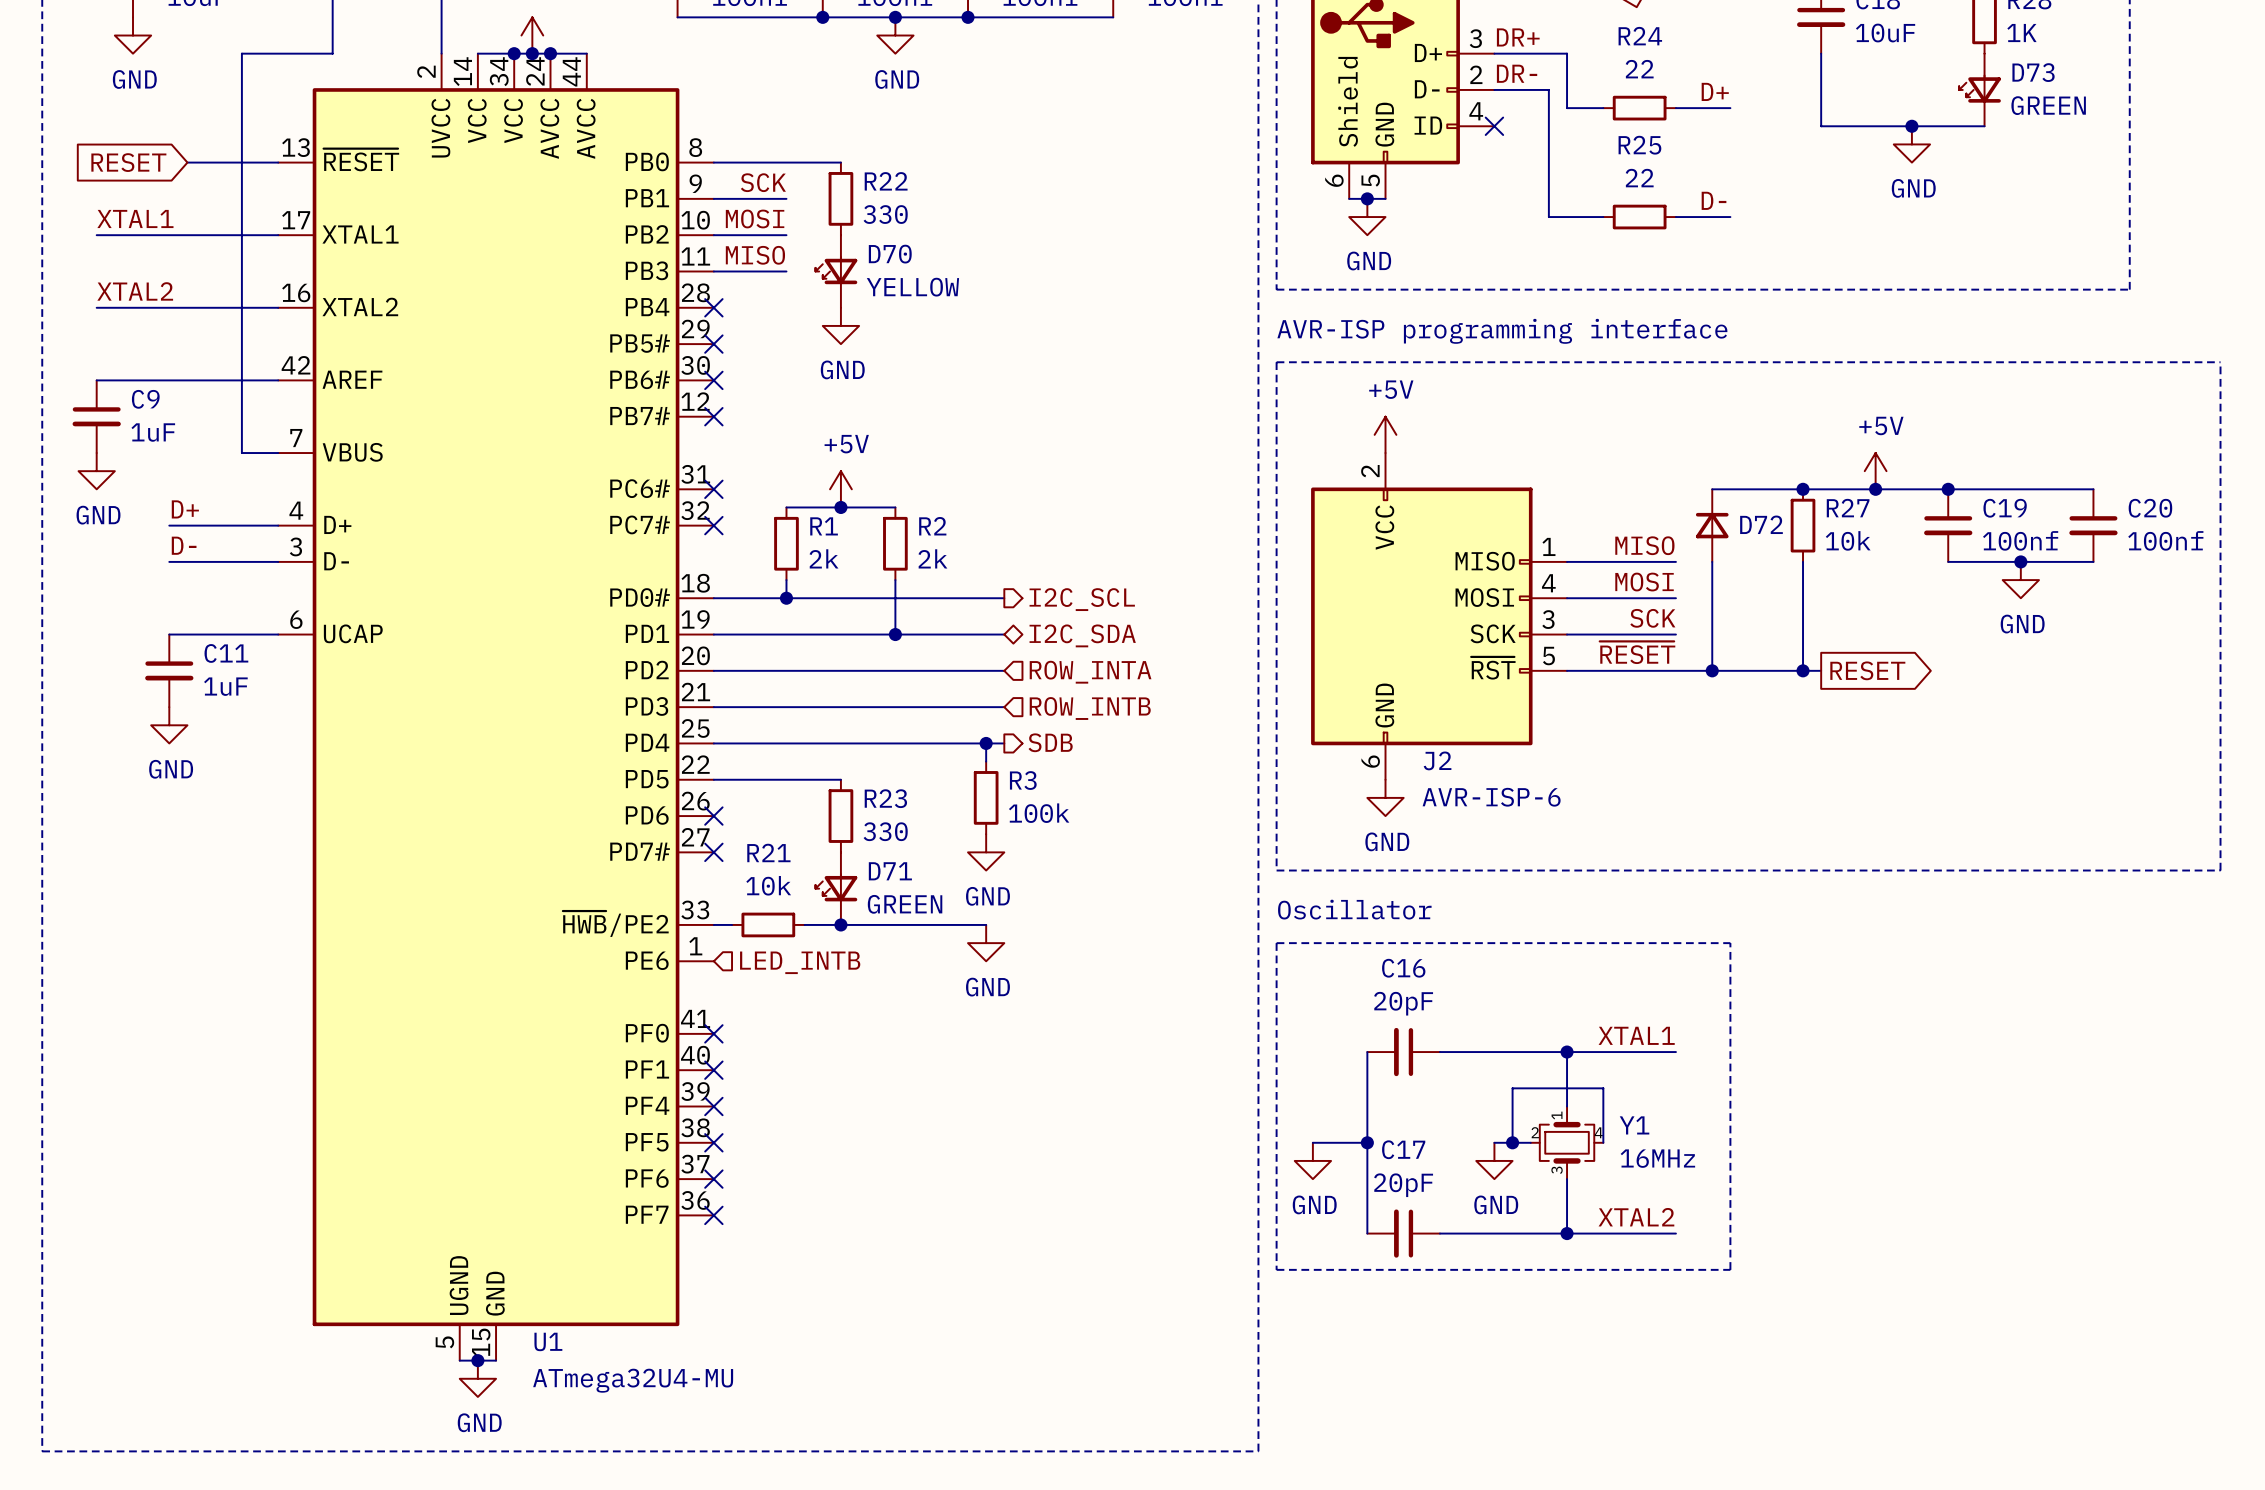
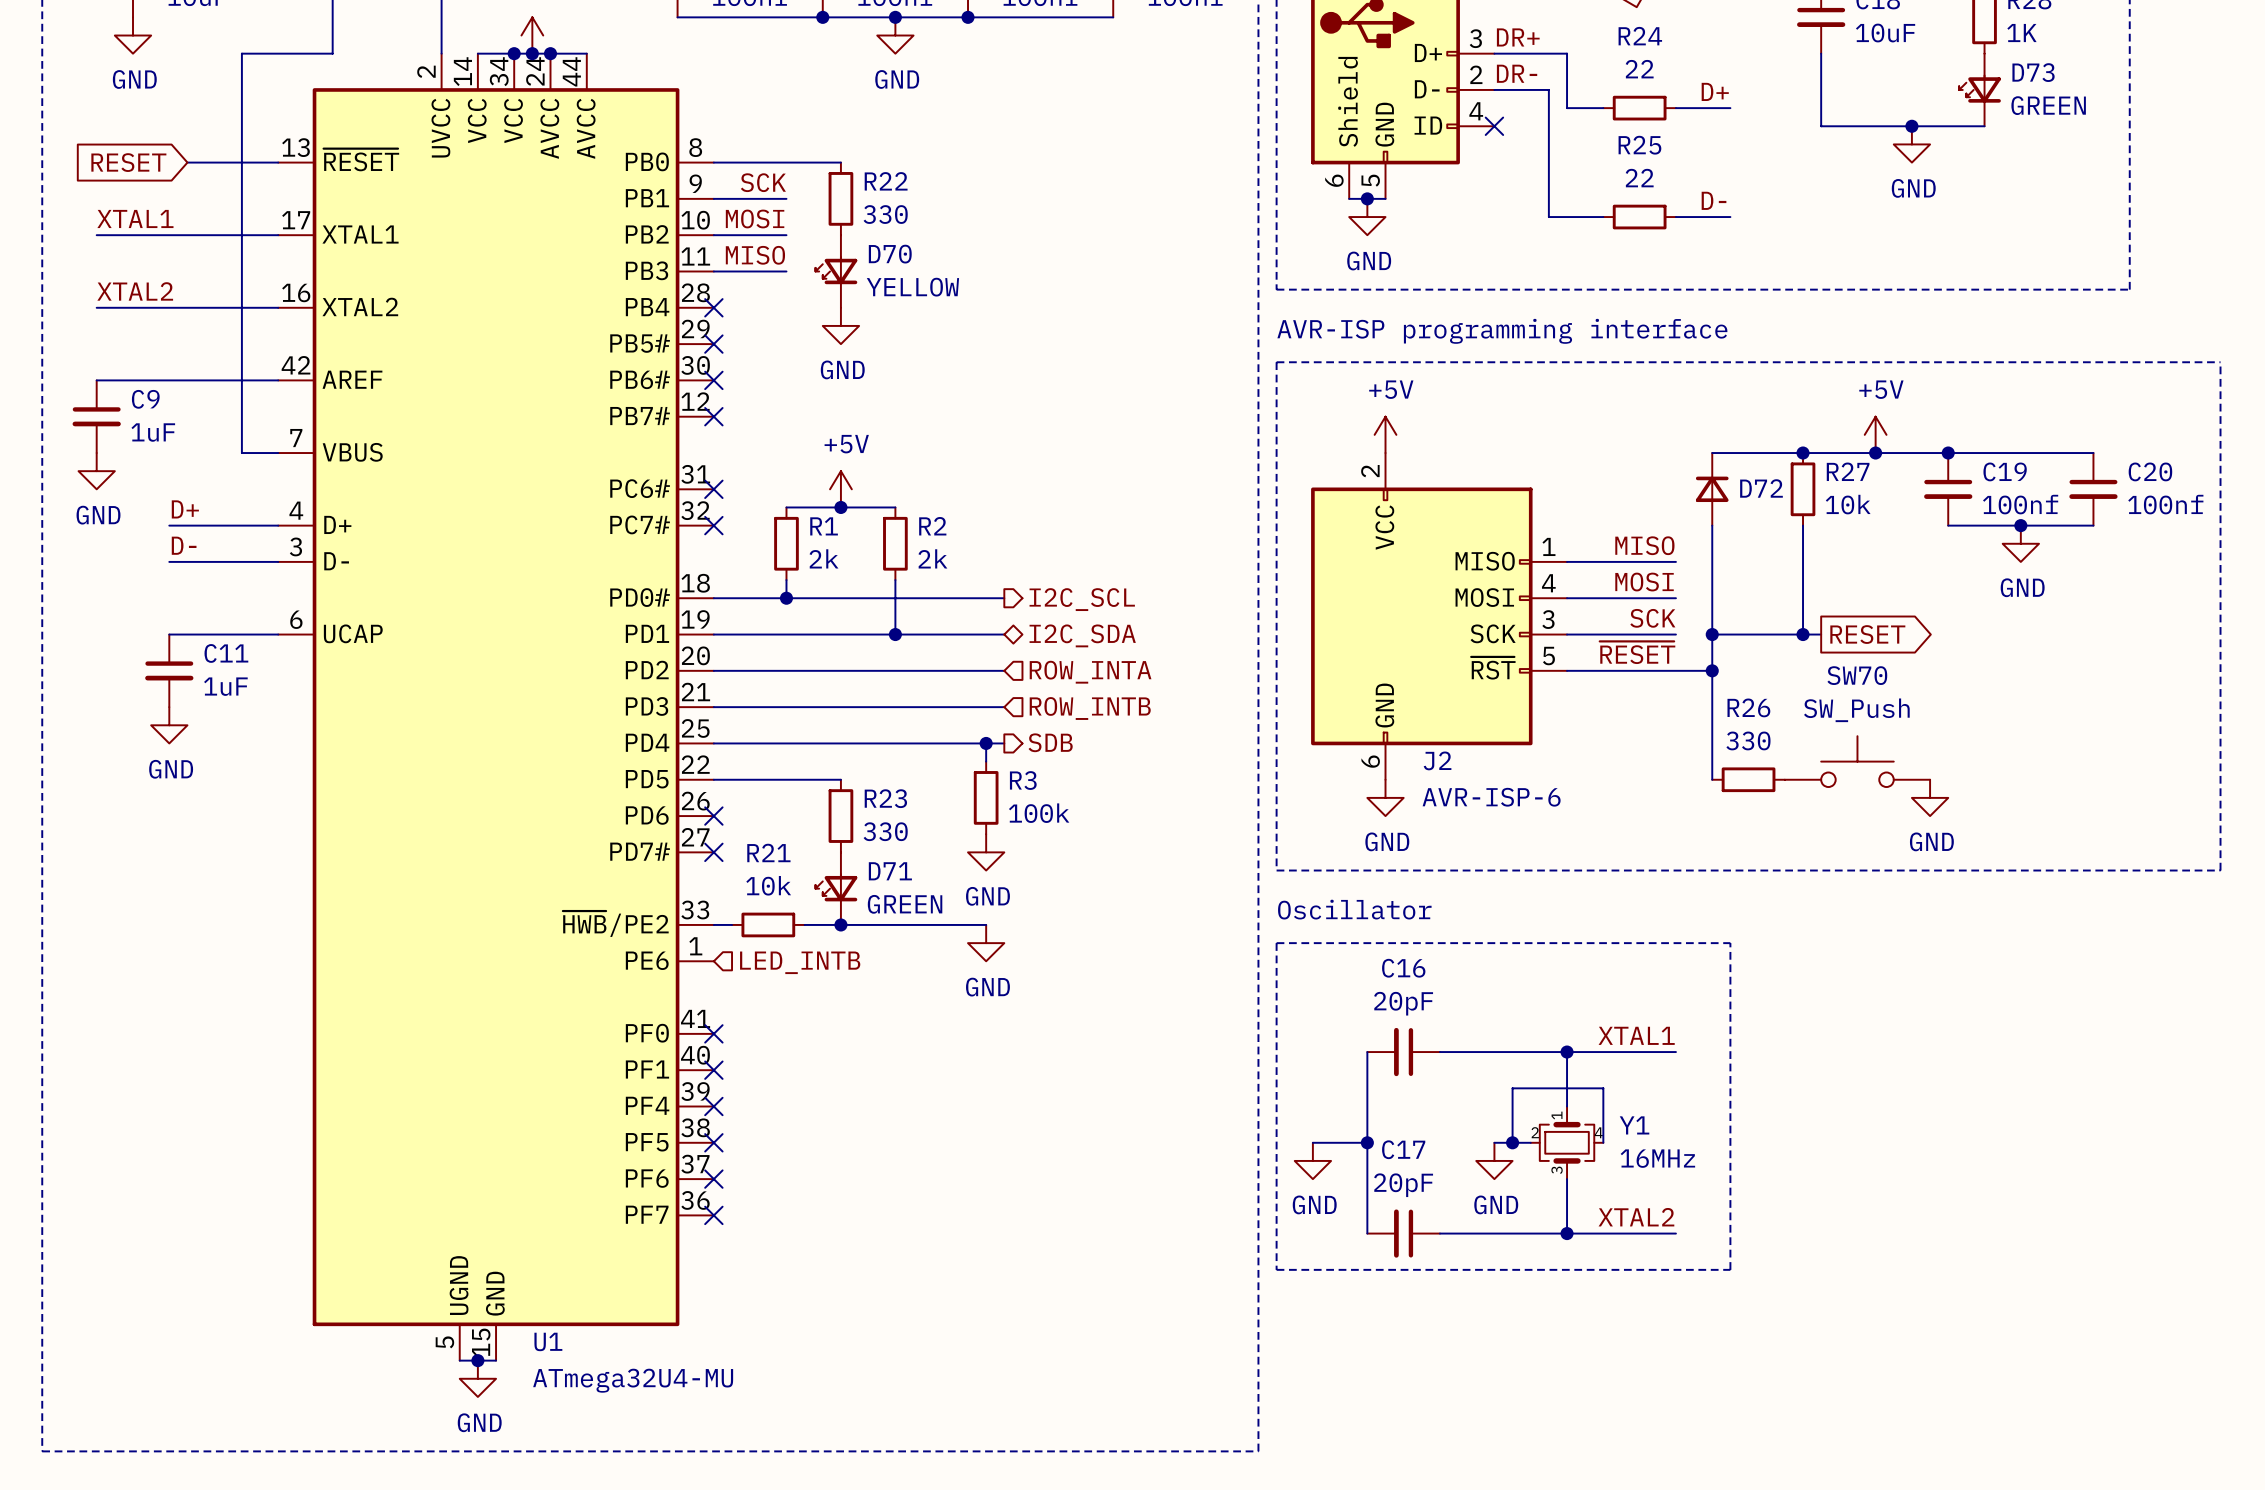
power symbol position: +5V (1875, 471) -> +5V (1875, 434)
wire: (1712, 489) (2093, 489) -> (1712, 453) (2093, 453)
junction position: (1803, 489) -> (1803, 453)
junction position: (1875, 489) -> (1875, 453)
junction position: (1948, 489) -> (1948, 453)
D72 position: (1712, 525) -> (1712, 489)
R27 position: (1803, 525) -> (1803, 489)
C19 position: (1948, 525) -> (1948, 489)
C20 position: (2093, 525) -> (2093, 489)
wire: (1948, 561) (2093, 561) -> (1948, 525) (2093, 525)
junction position: (2020, 561) -> (2020, 525)
power symbol position: GND (2020, 580) -> GND (2020, 543)
wire: none -> (1712, 634) (1821, 634)
junction: none -> (1712, 634)
wire: (1803, 634) (1803, 670) -> (1803, 525) (1803, 561)
wire: (1712, 670) (1821, 670) -> (1712, 670) (1712, 779)
junction position: (1803, 670) -> (1803, 634)
global label position: RESET (1867, 670) -> RESET (1867, 634)
SW70: none -> SW_Push (1857, 761)
R26: none -> 330 (1748, 779)
power symbol: none -> GND (1930, 797)

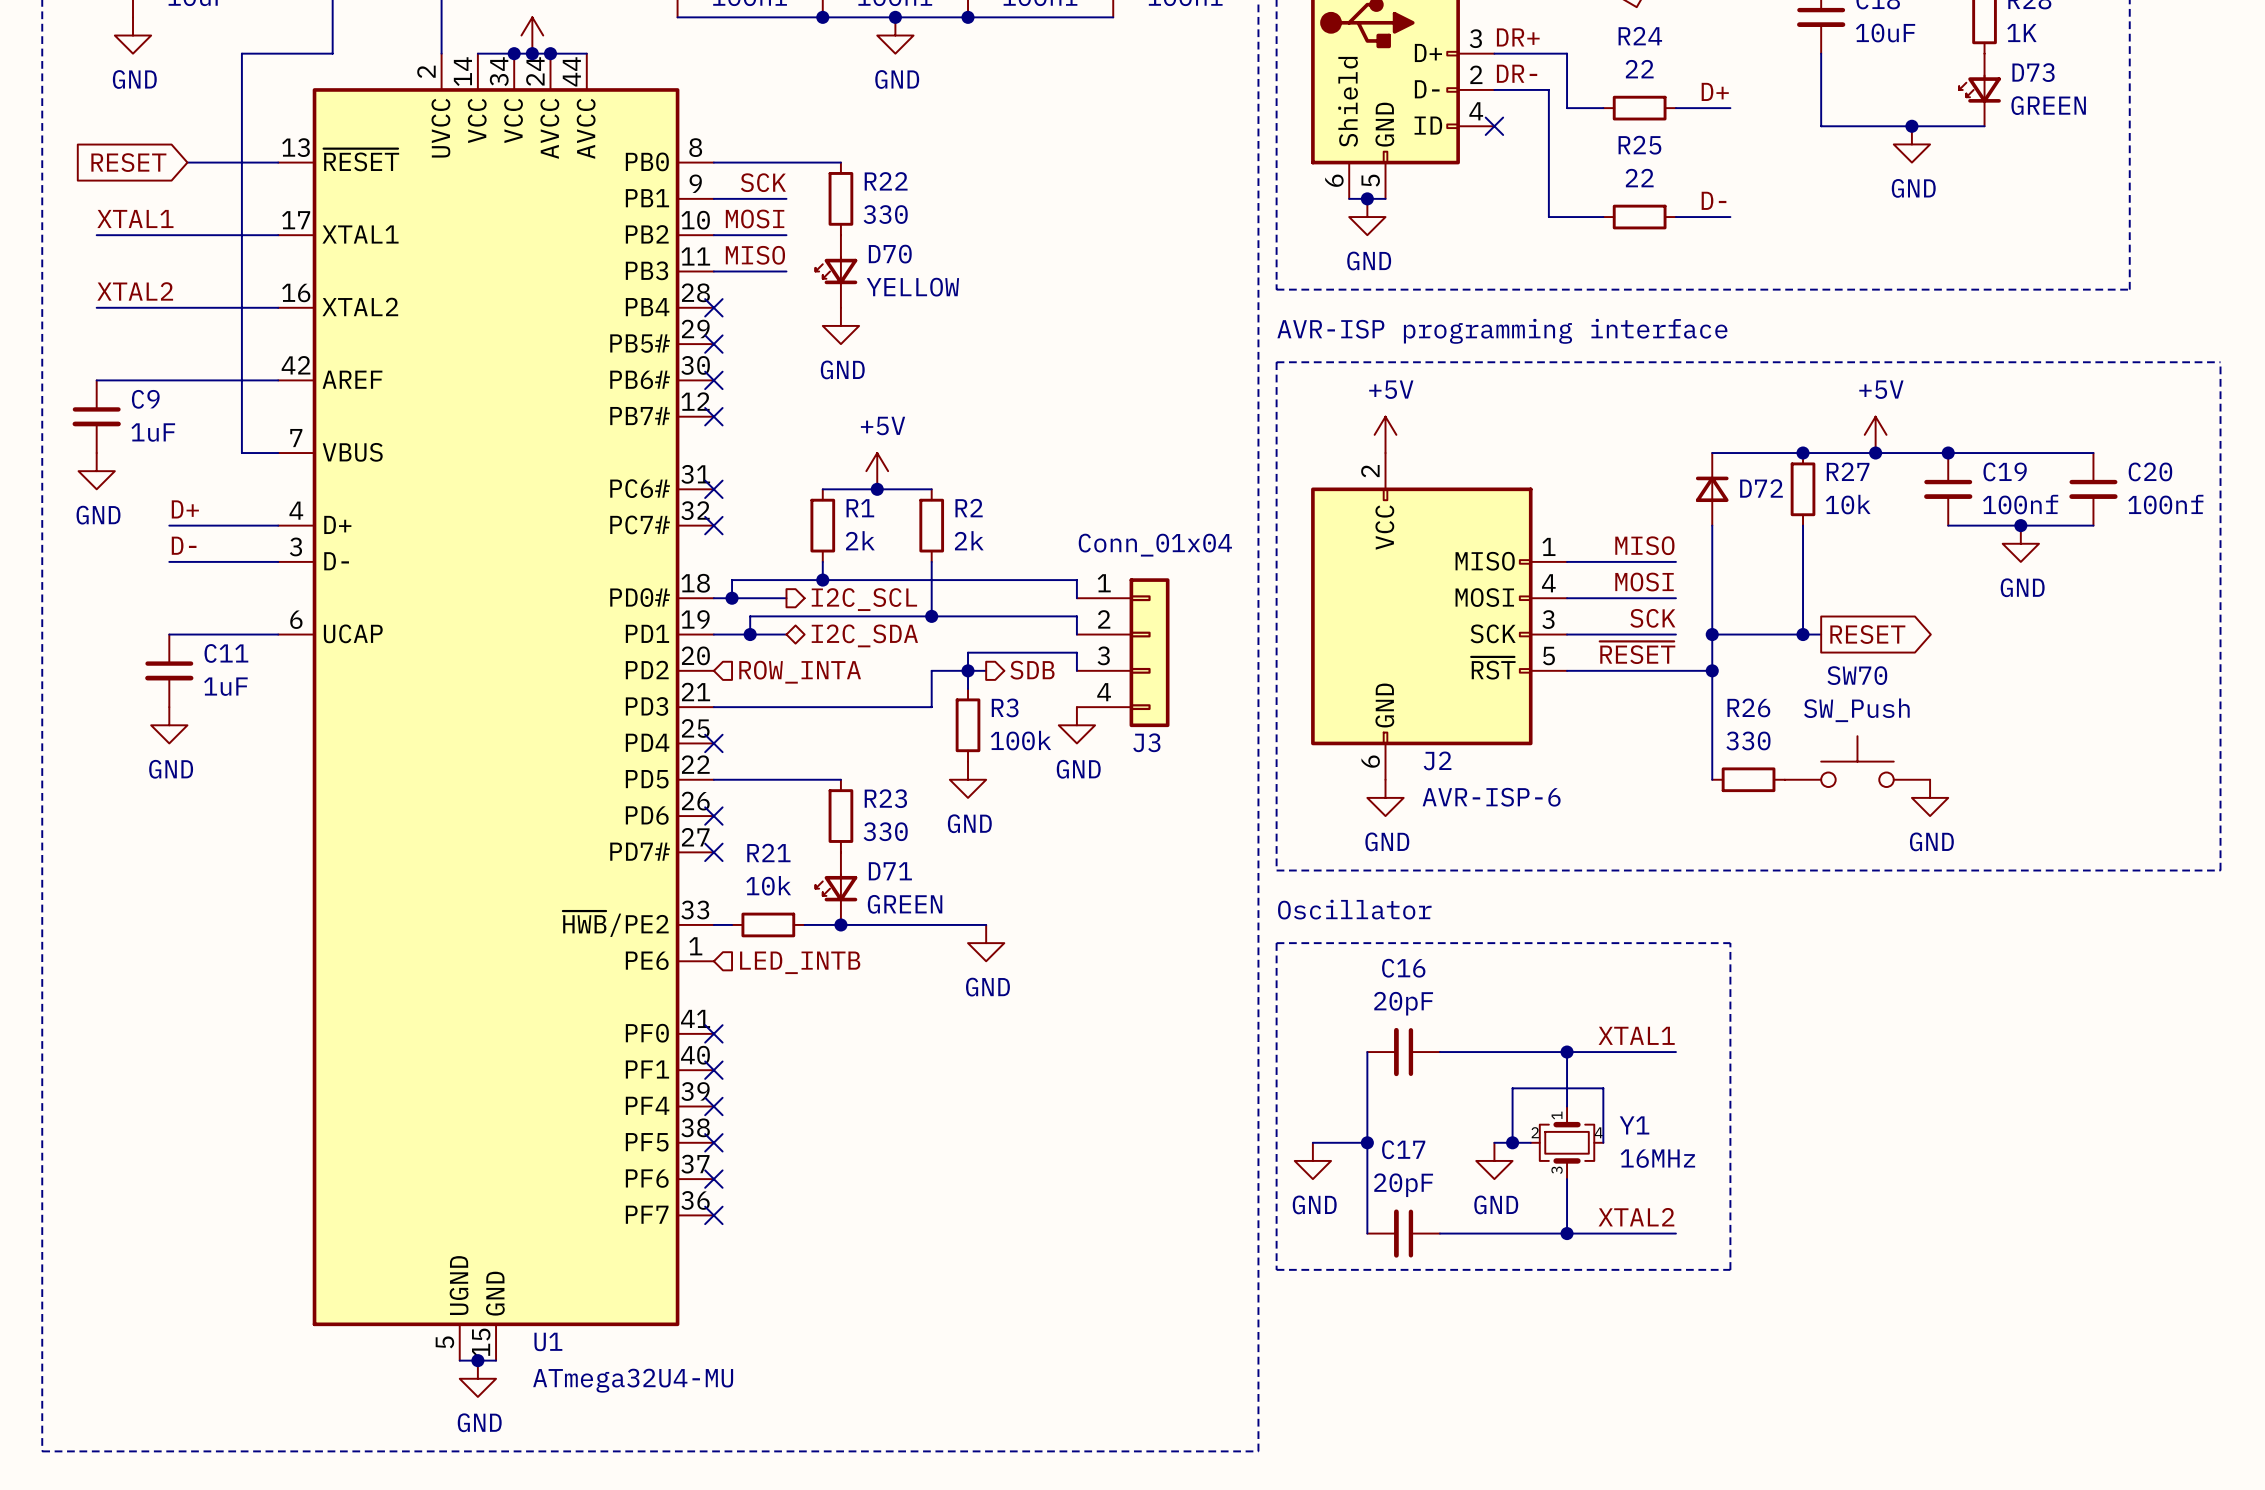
power symbol position: +5V (840, 489) -> +5V (877, 471)
junction: none -> (877, 489)
wire: (786, 507) (895, 507) -> (822, 489) (931, 489)
junction: (840, 507) -> none
R1 position: (786, 543) -> (822, 525)
R2 position: (895, 543) -> (931, 525)
wire: (786, 580) (786, 598) (1004, 598) -> none
junction: none -> (822, 580)
wire: (895, 580) (895, 634) -> (931, 561) (931, 616)
wire: none -> (732, 598) (732, 580) (1076, 580) (1076, 598)
junction: none -> (732, 598)
junction: (786, 598) -> none
hierarchical label position: I2C_SCL (1082, 599) -> I2C_SCL (864, 599)
junction: none -> (931, 616)
wire: none -> (750, 634) (750, 616) (1076, 616) (1076, 634)
junction: none -> (750, 634)
wire: (786, 634) (1004, 634) -> none
junction: (895, 634) -> none
hierarchical label position: I2C_SDA (1082, 635) -> I2C_SDA (864, 635)
J3: none -> Conn_01x04 (1123, 652)
wire: (713, 670) (931, 670) -> none
junction: none -> (968, 670)
wire: (986, 670) (1004, 670) -> none
wire: none -> (1076, 670) (1076, 652) (968, 652) (968, 688)
hierarchical label position: ROW_INTA (1090, 672) -> ROW_INTA (800, 672)
wire: (931, 707) (1004, 707) -> (931, 707) (931, 670)
hierarchical label: ROW_INTB (1090, 708) -> none
power symbol: none -> GND (1076, 725)
hierarchical label position: SDB (1050, 742) -> SDB (1032, 670)
wire: (713, 743) (1004, 743) -> none
no-connect mark: none -> (713, 743)
wire: (986, 743) (986, 761) -> (822, 561) (822, 580)
junction: (986, 743) -> none
R3 position: (986, 797) -> (968, 725)
power symbol position: GND (986, 852) -> GND (968, 779)

